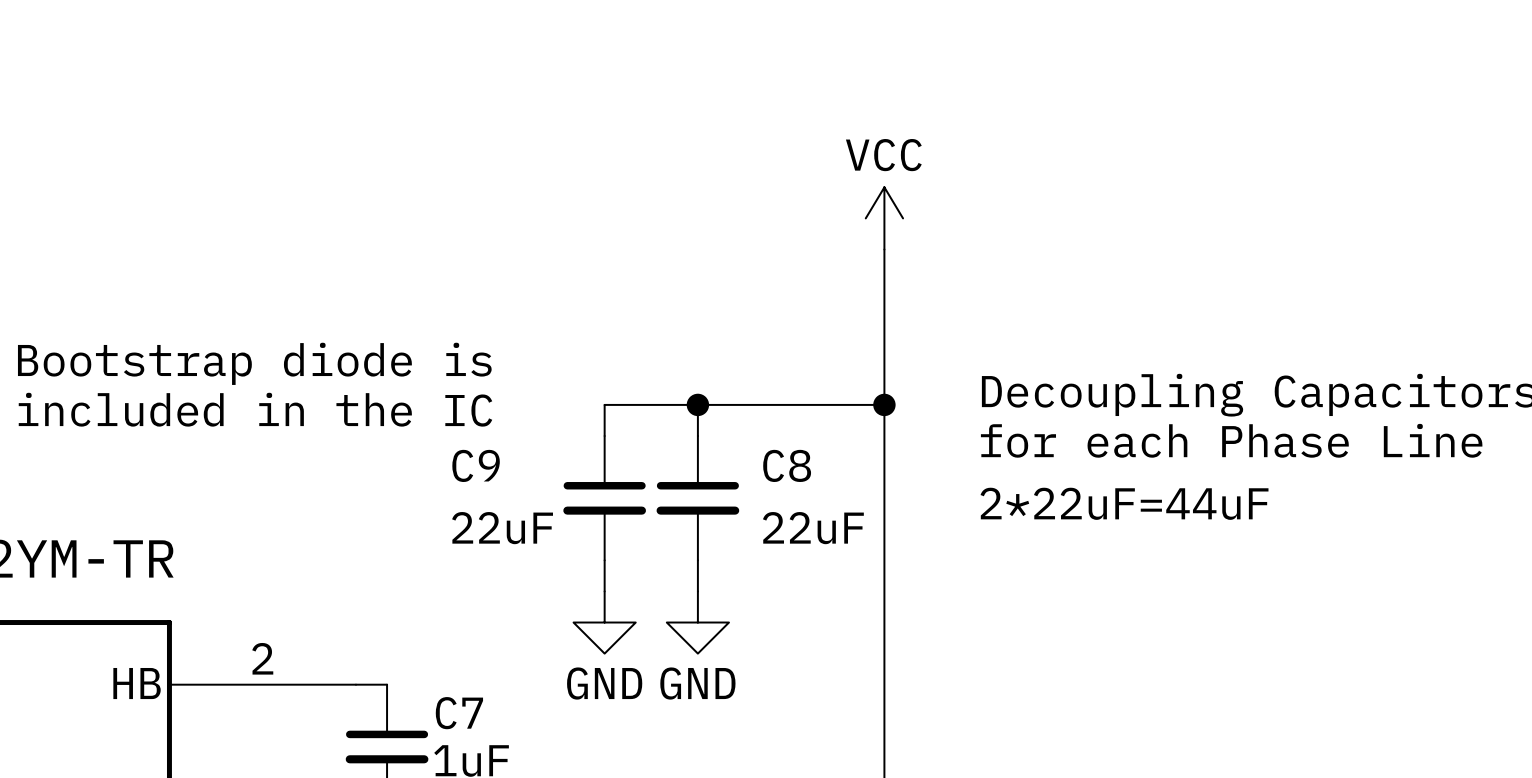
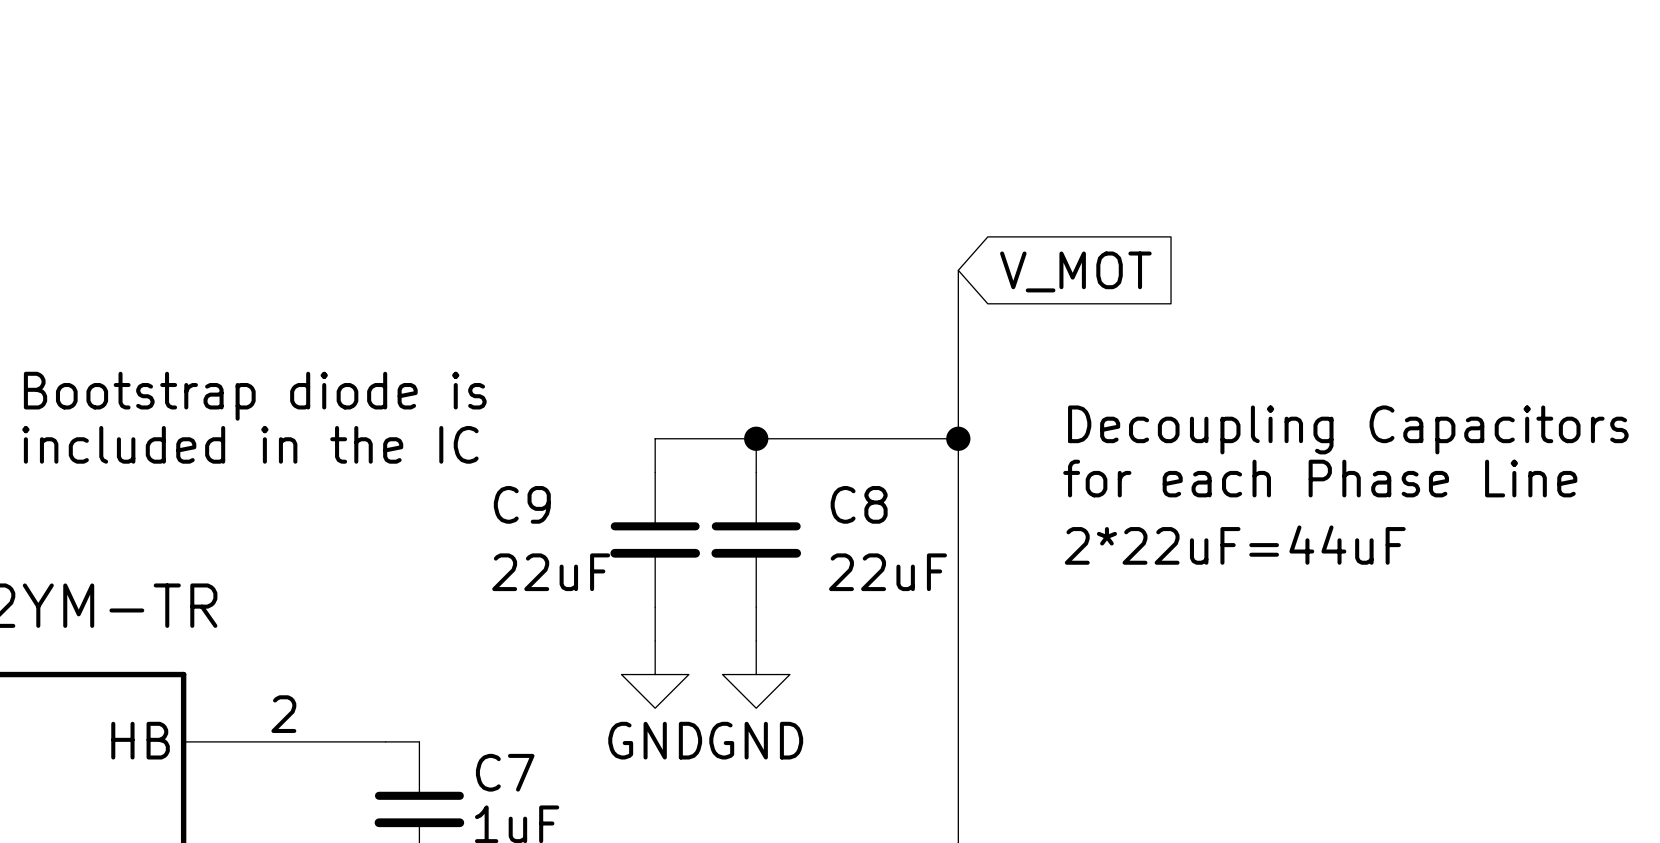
power symbol: VCC (884, 218) -> none
global label: none -> V_MOT (1075, 271)

